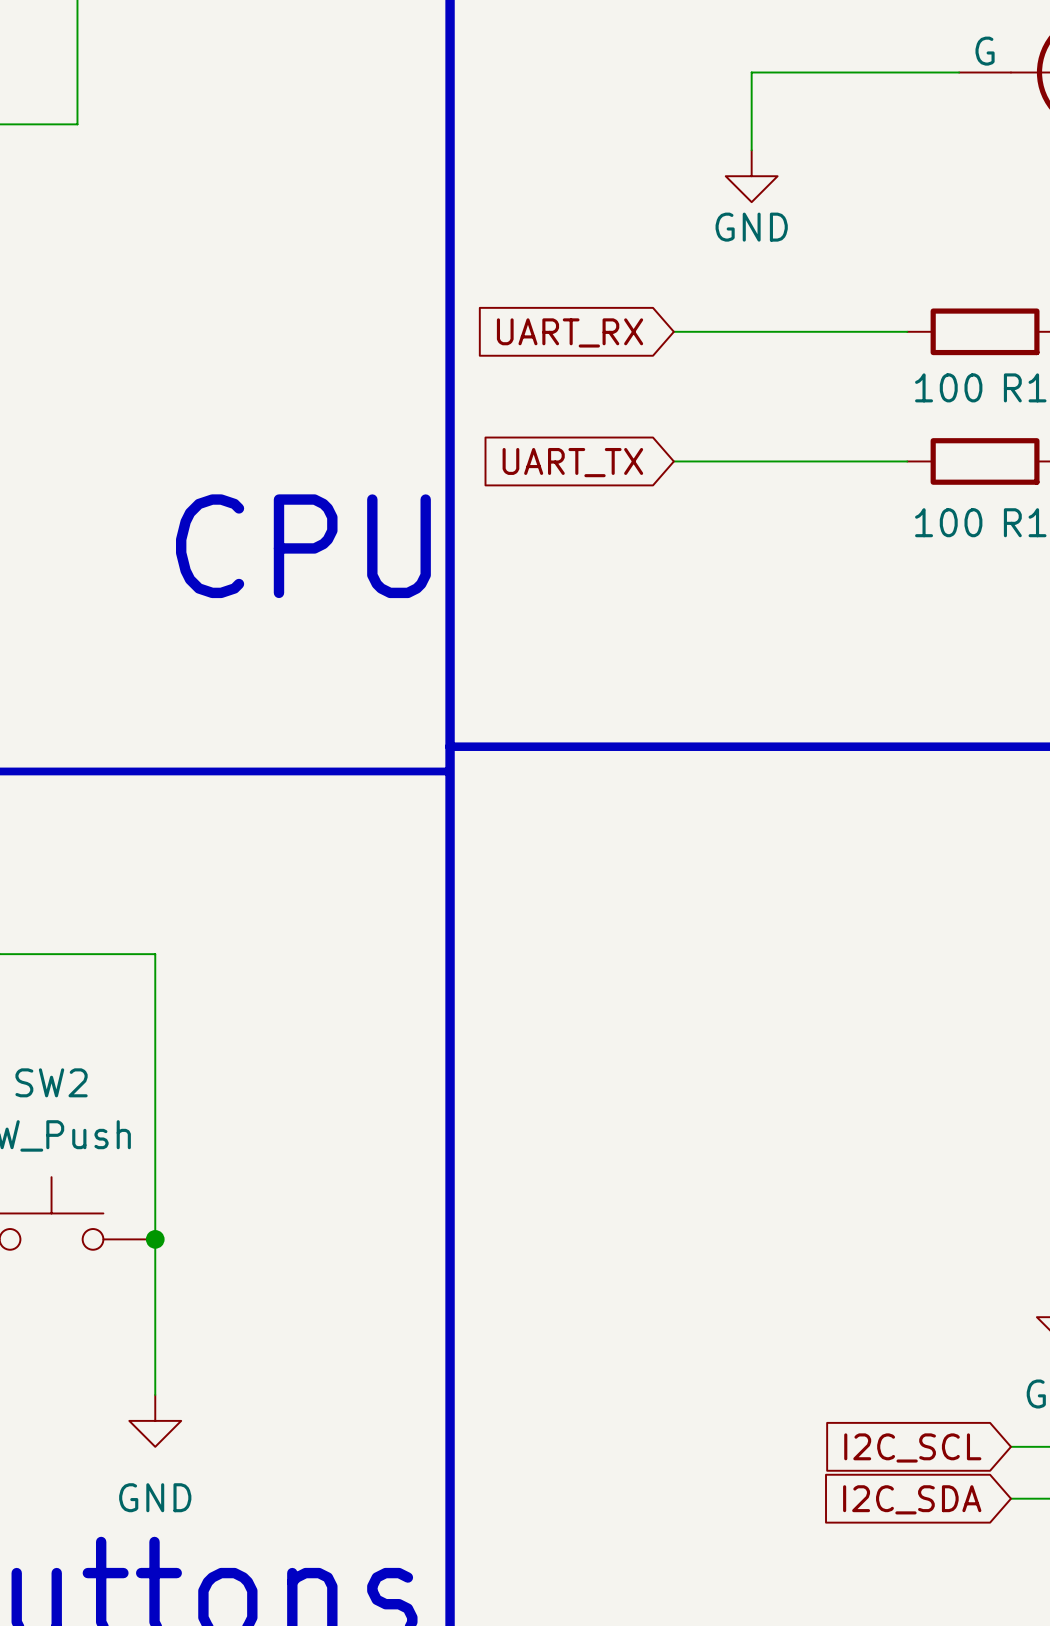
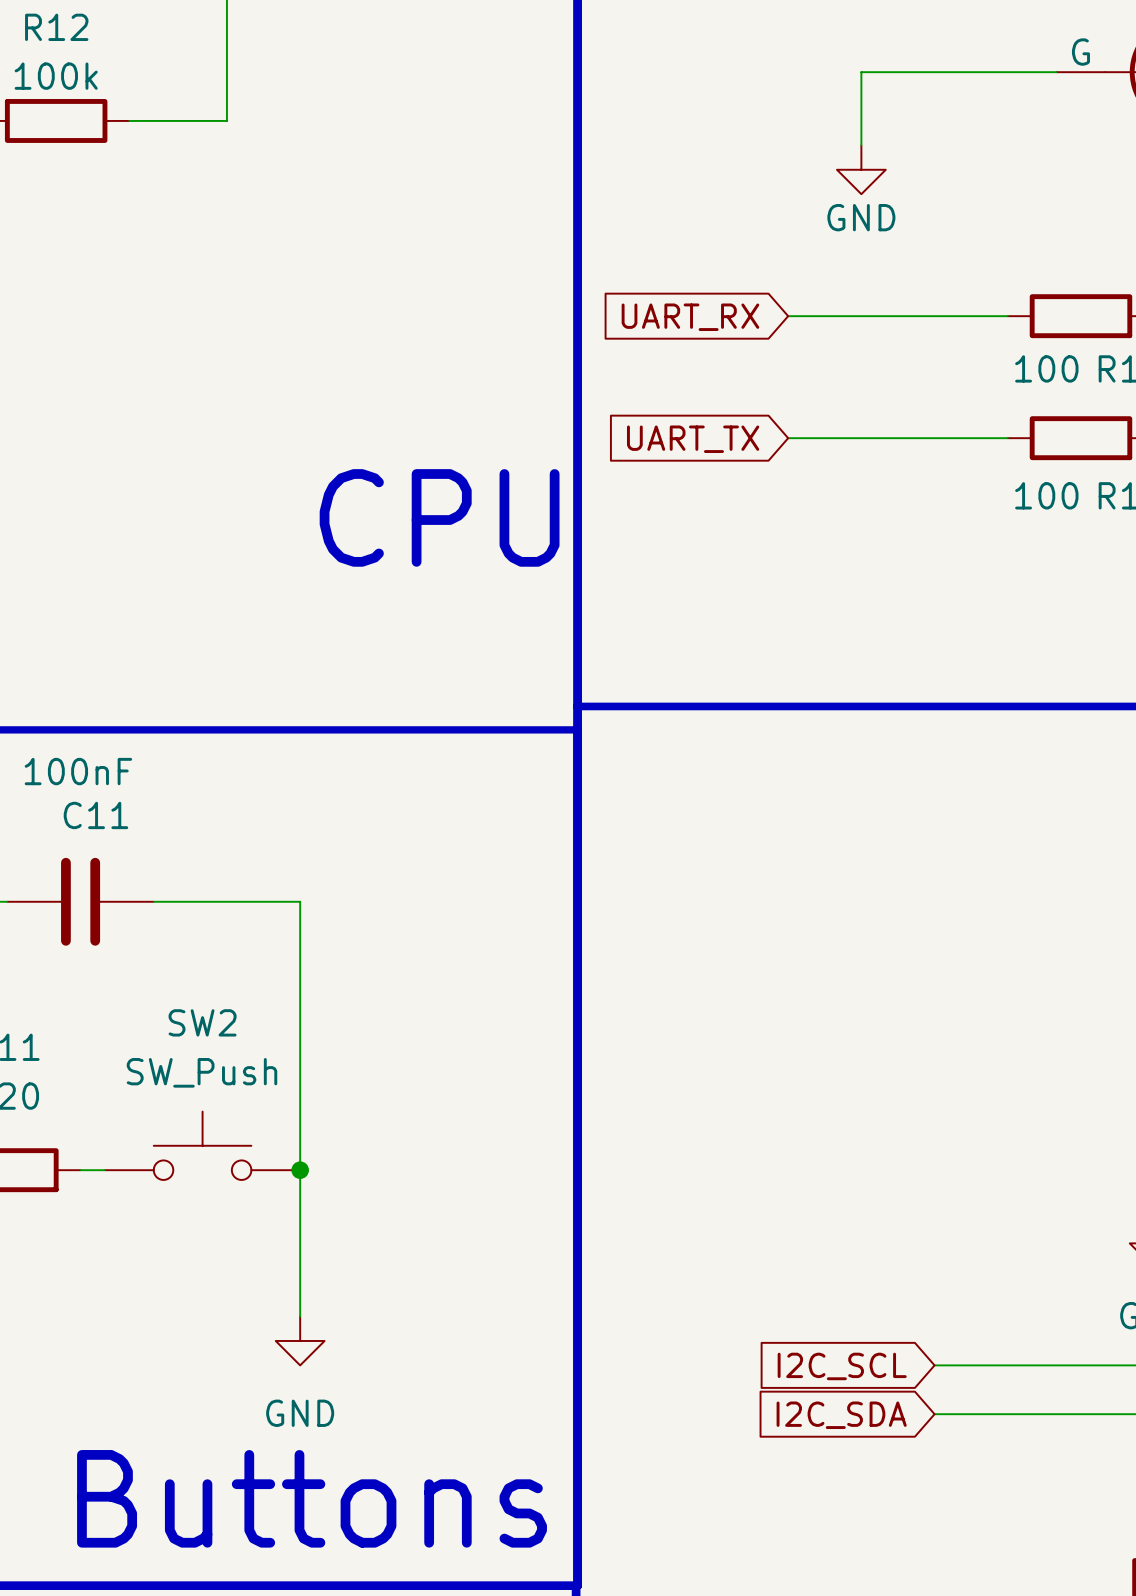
wire: none -> (934, 1365) (1105, 1365)
global label position: I2C_SCL (912, 1447) -> I2C_SCL (842, 1366)
wire: none -> (934, 1414) (1105, 1414)
global label position: I2C_SDA (912, 1499) -> I2C_SDA (841, 1415)

